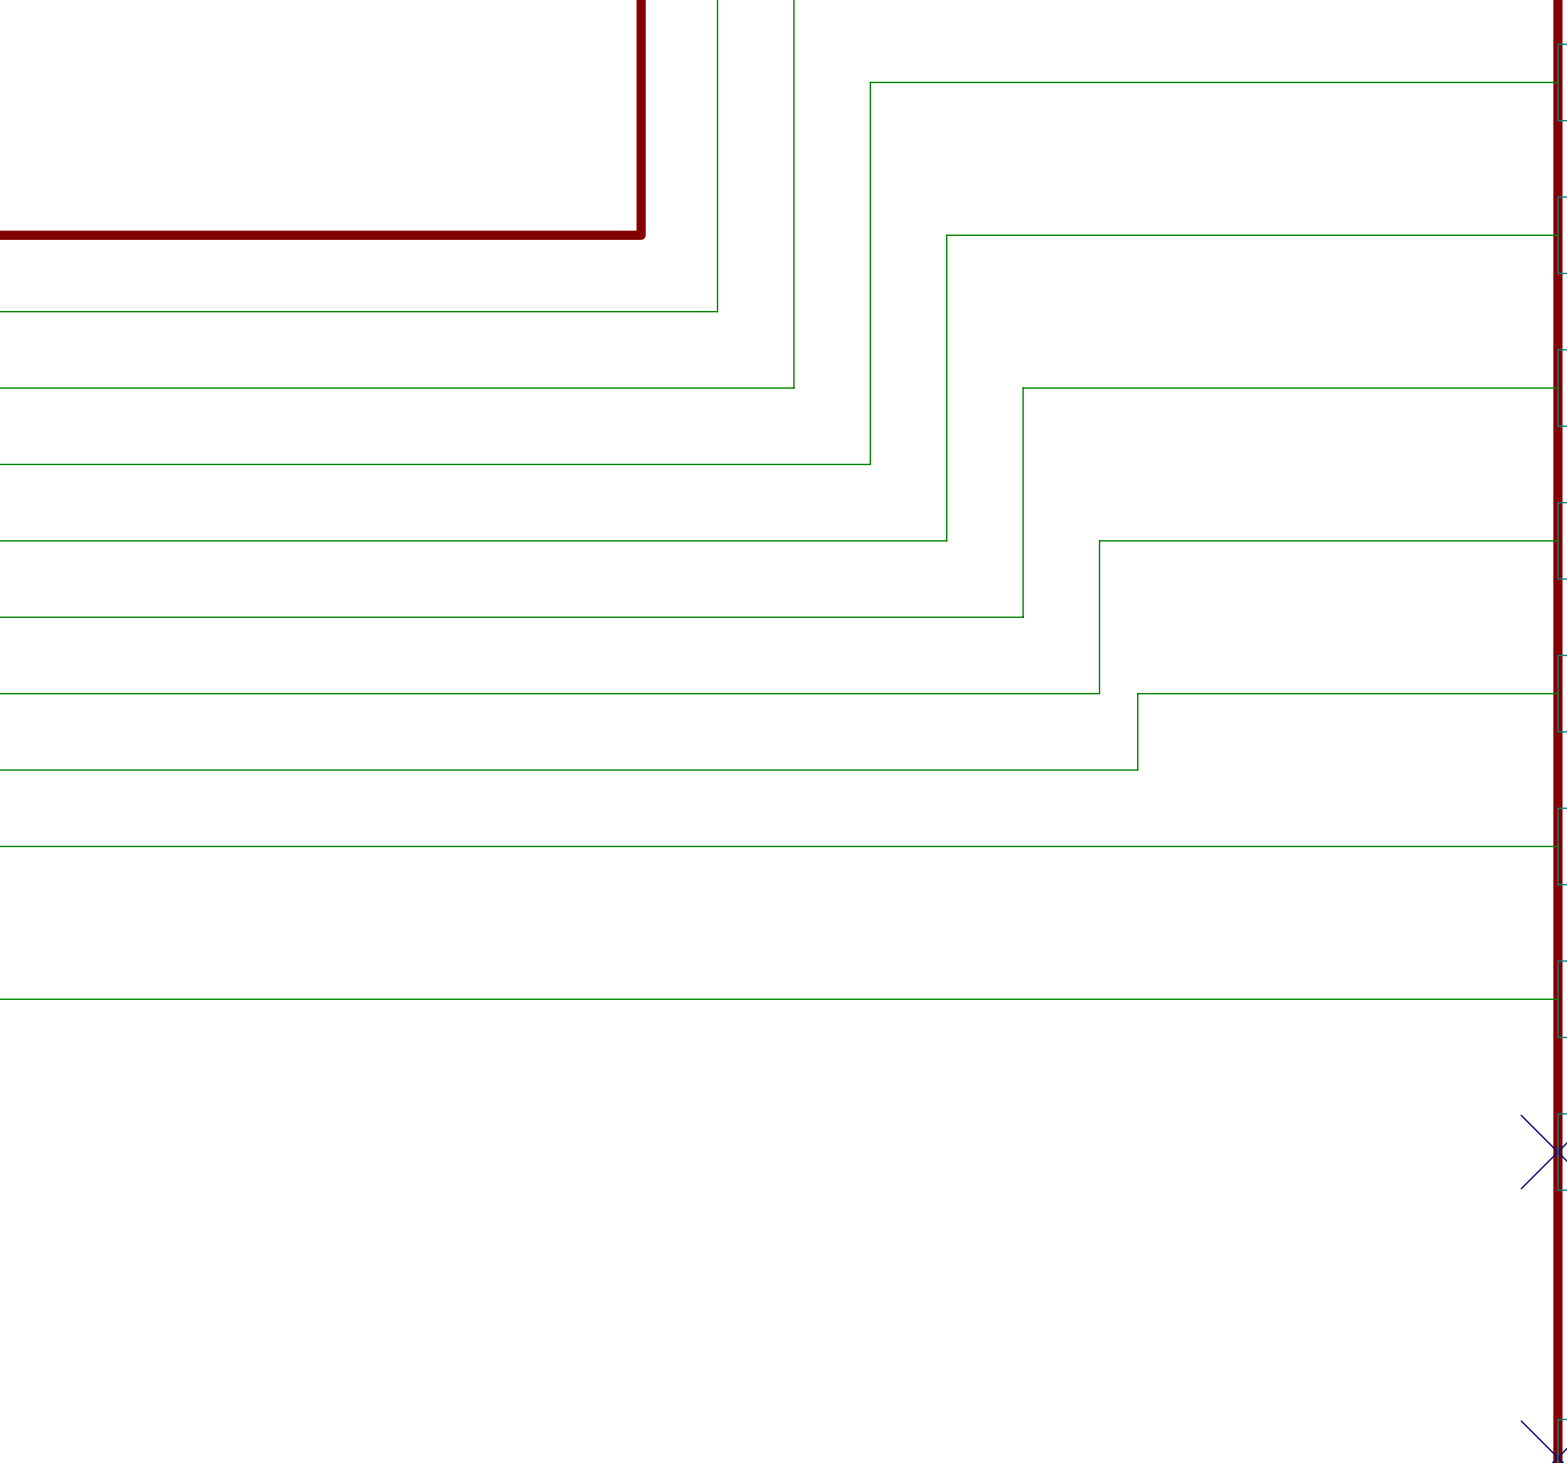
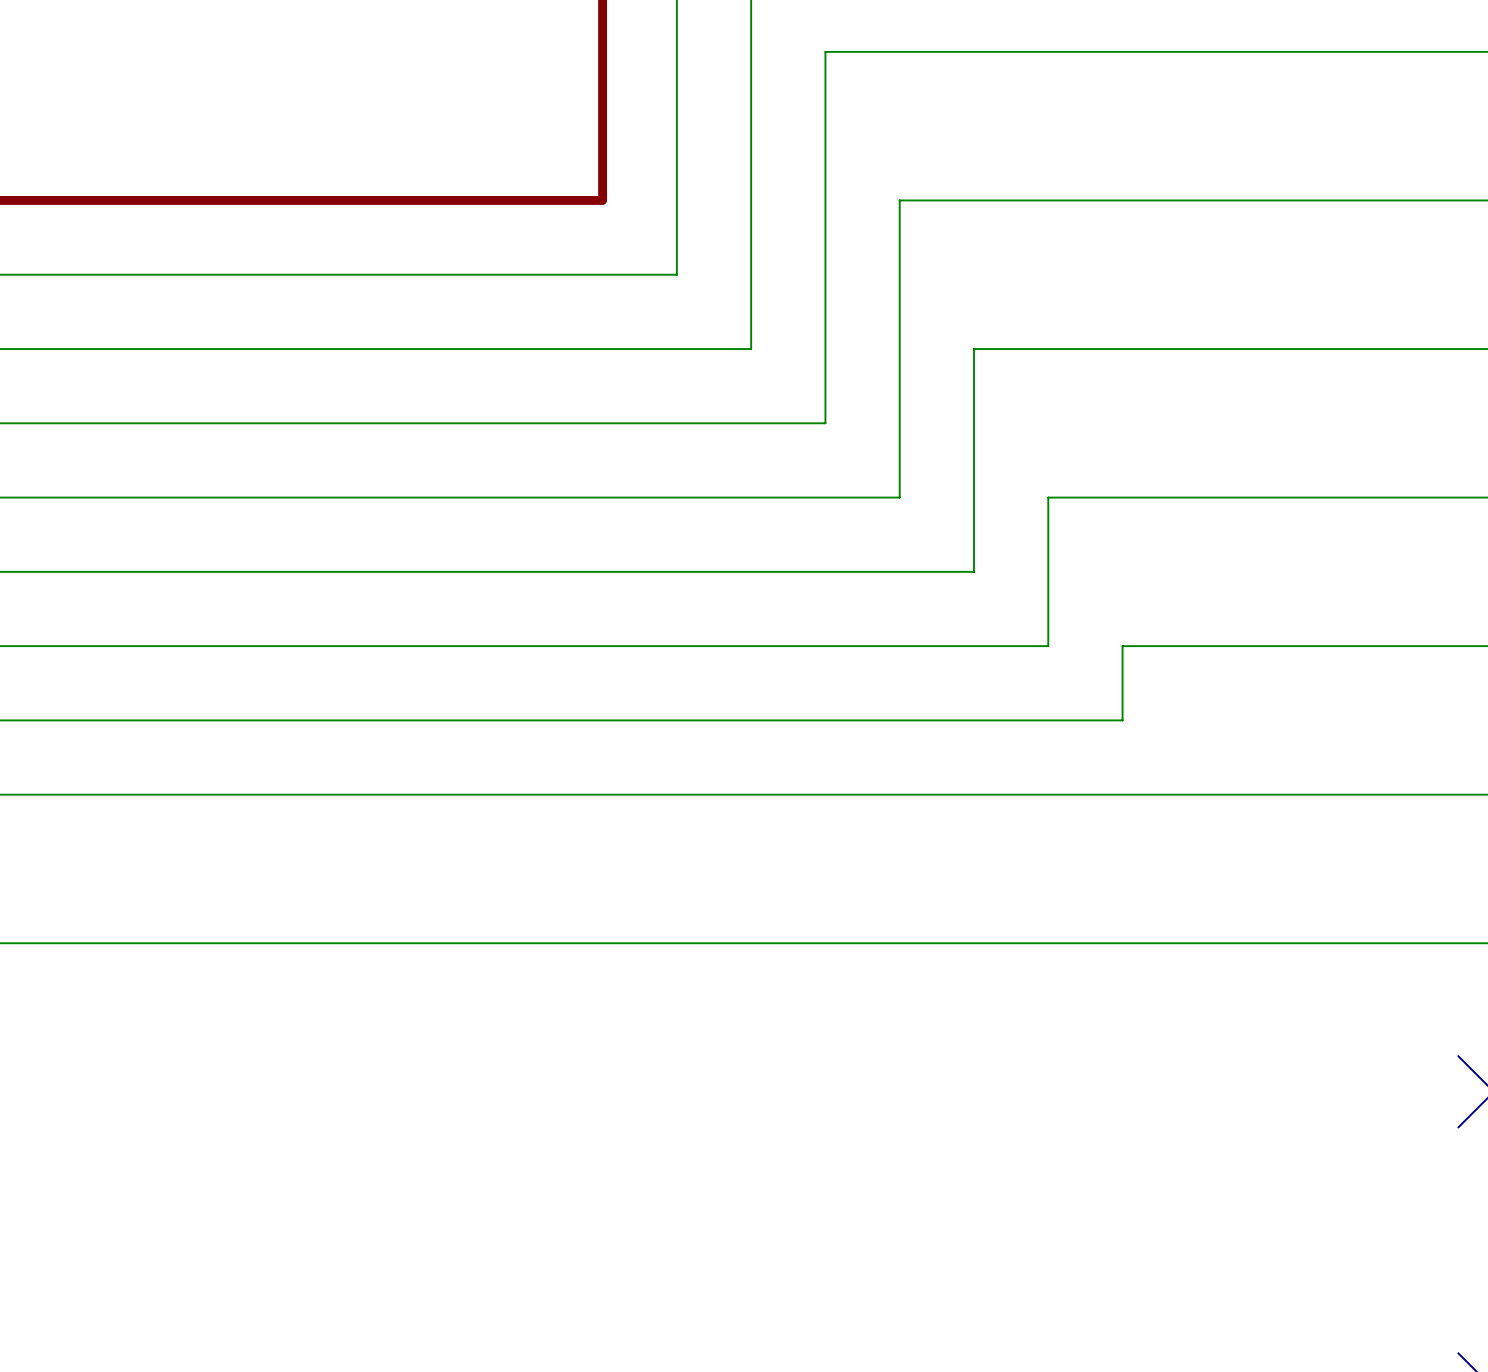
wire: (1175, 693) (1137, 693) (1137, 770) -> (1122, 646) (1122, 720) (1085, 720)

